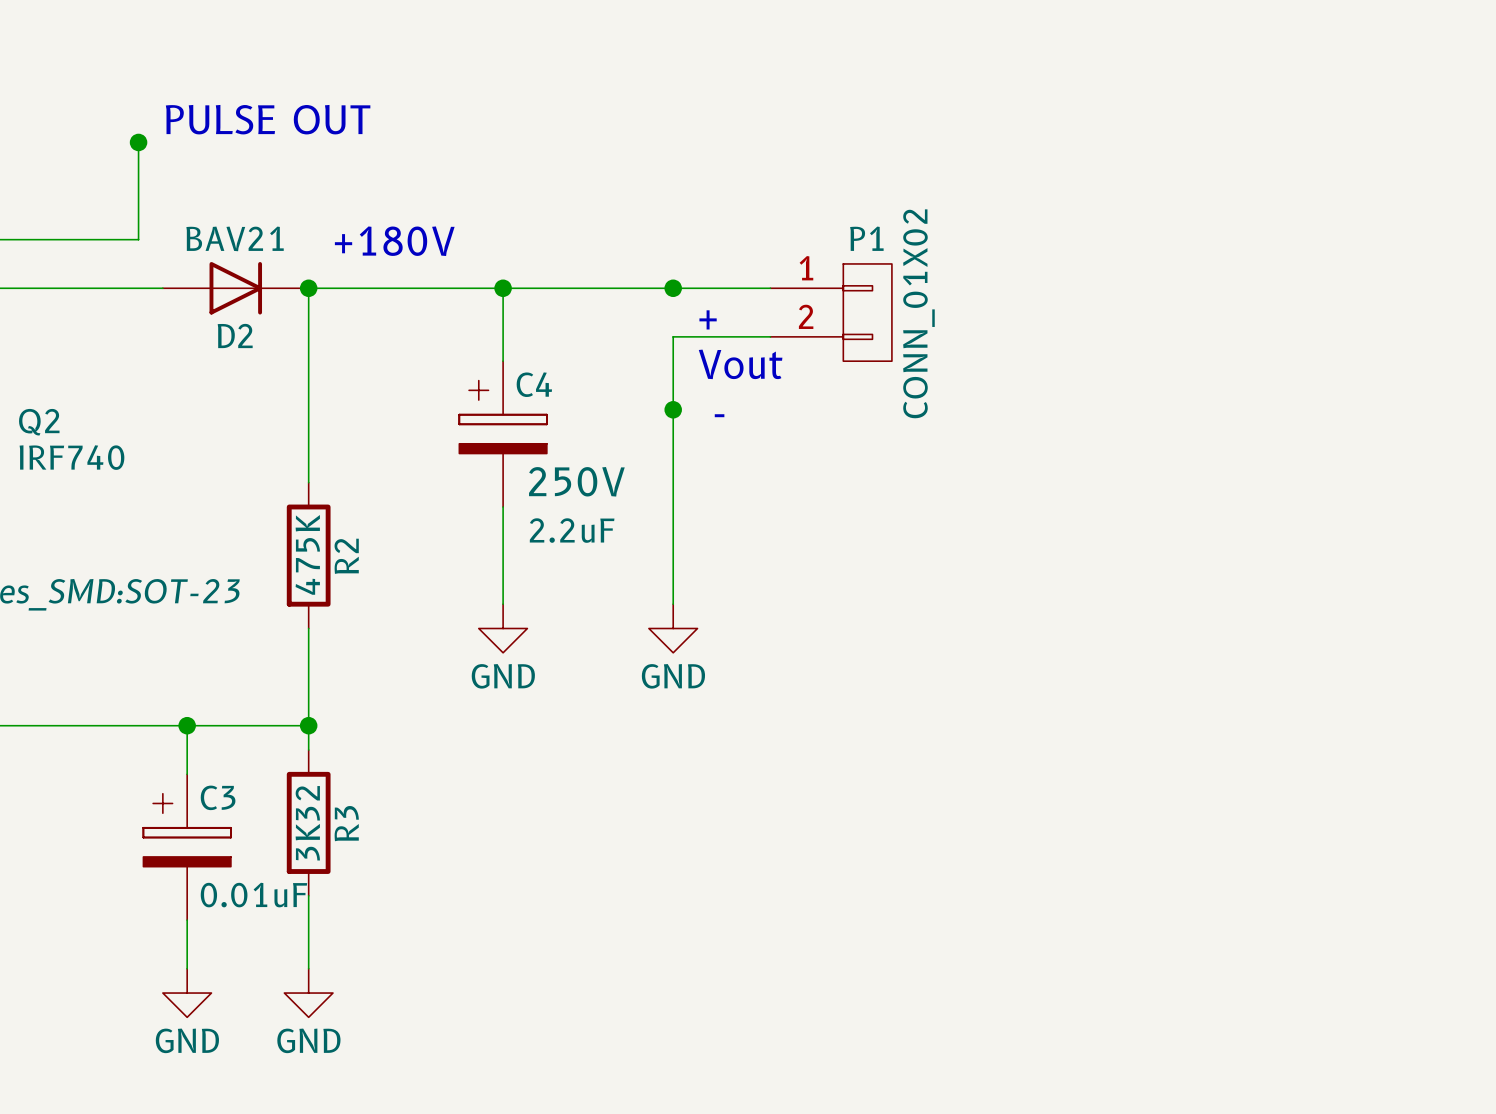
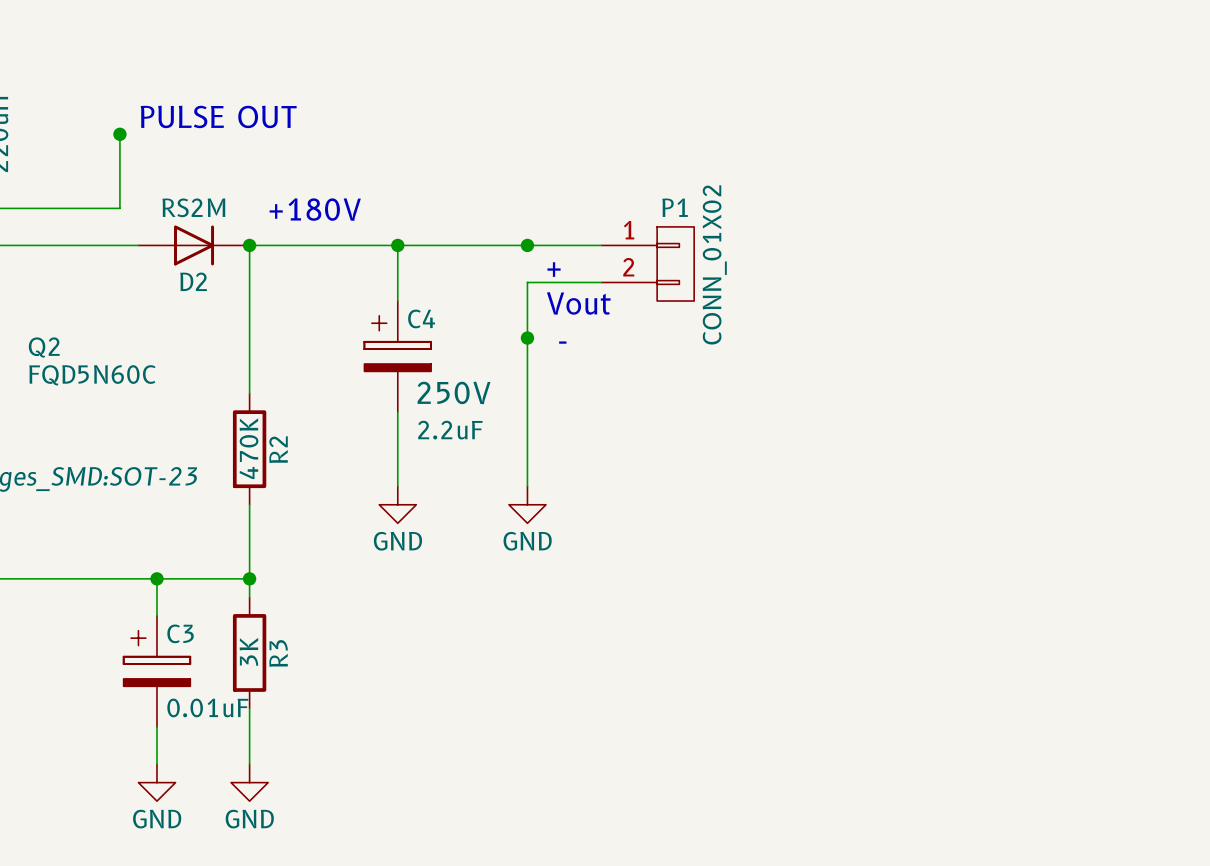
D2 value: BAV21 (235, 238) -> RS2M (193, 207)
Q2 value: IRF740 (71, 457) -> FQD5N60C (92, 375)
R2 value: 475K (307, 554) -> 470K (249, 448)
R3 value: 3K32 (307, 823) -> 3K (248, 651)

